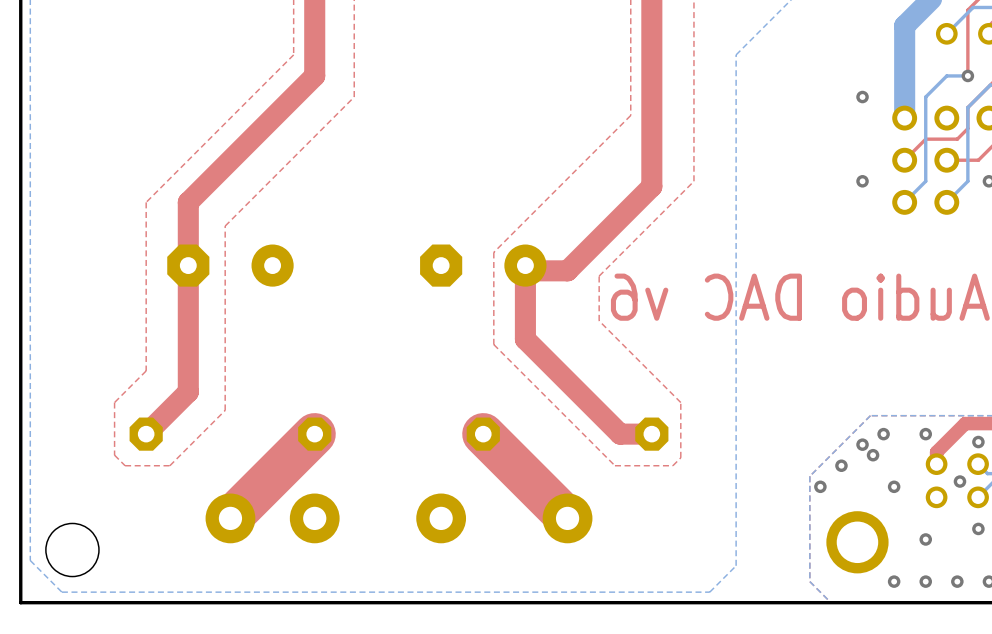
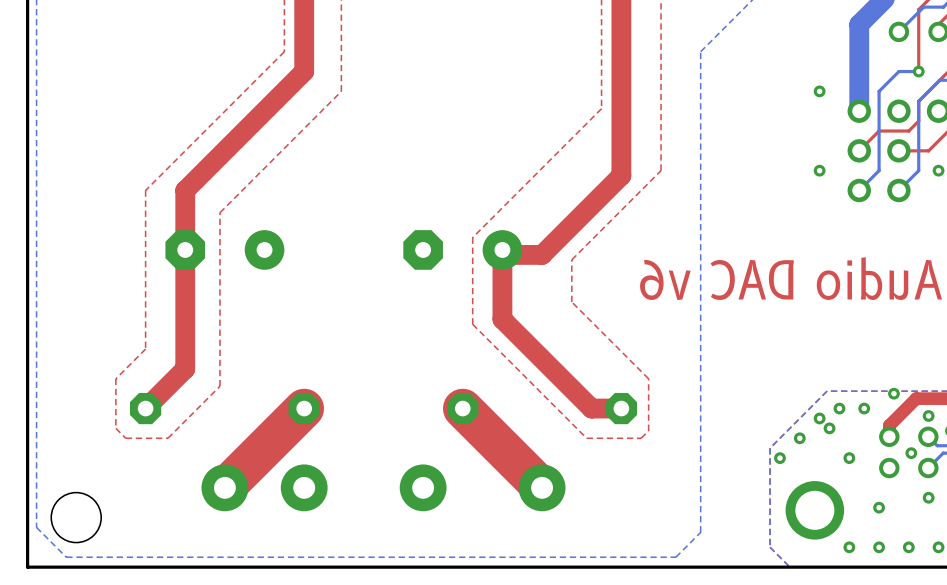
via: none -> (893, 393)
via: none -> (864, 408)
via: (925, 434) -> none

